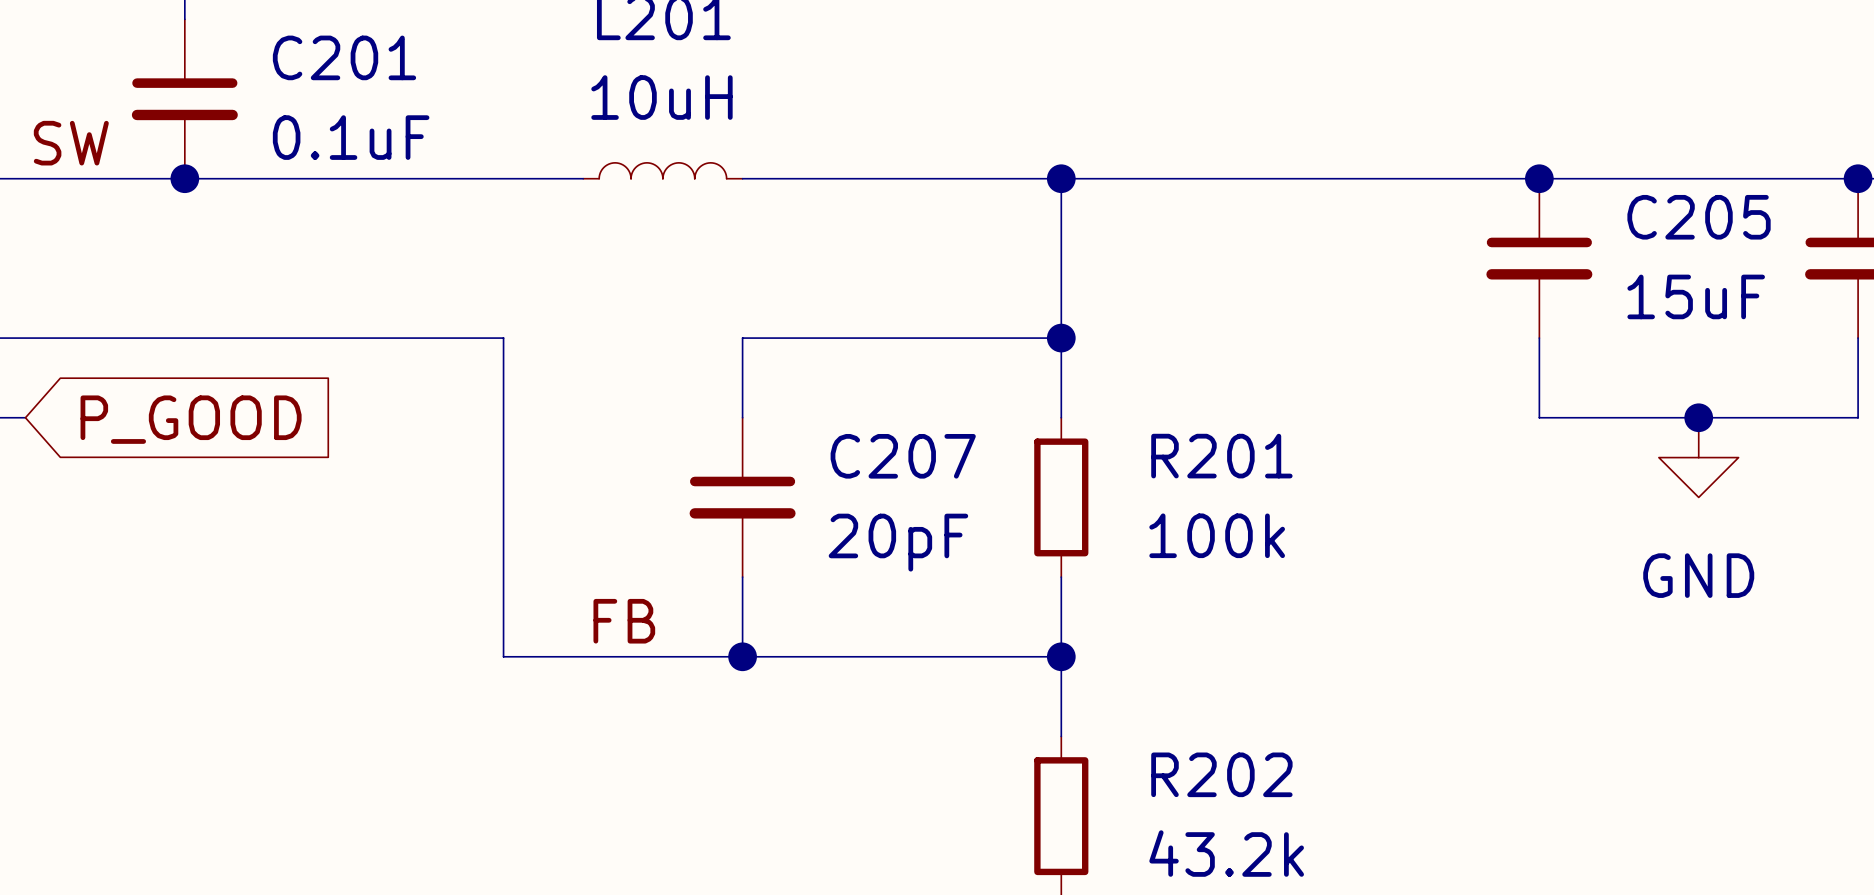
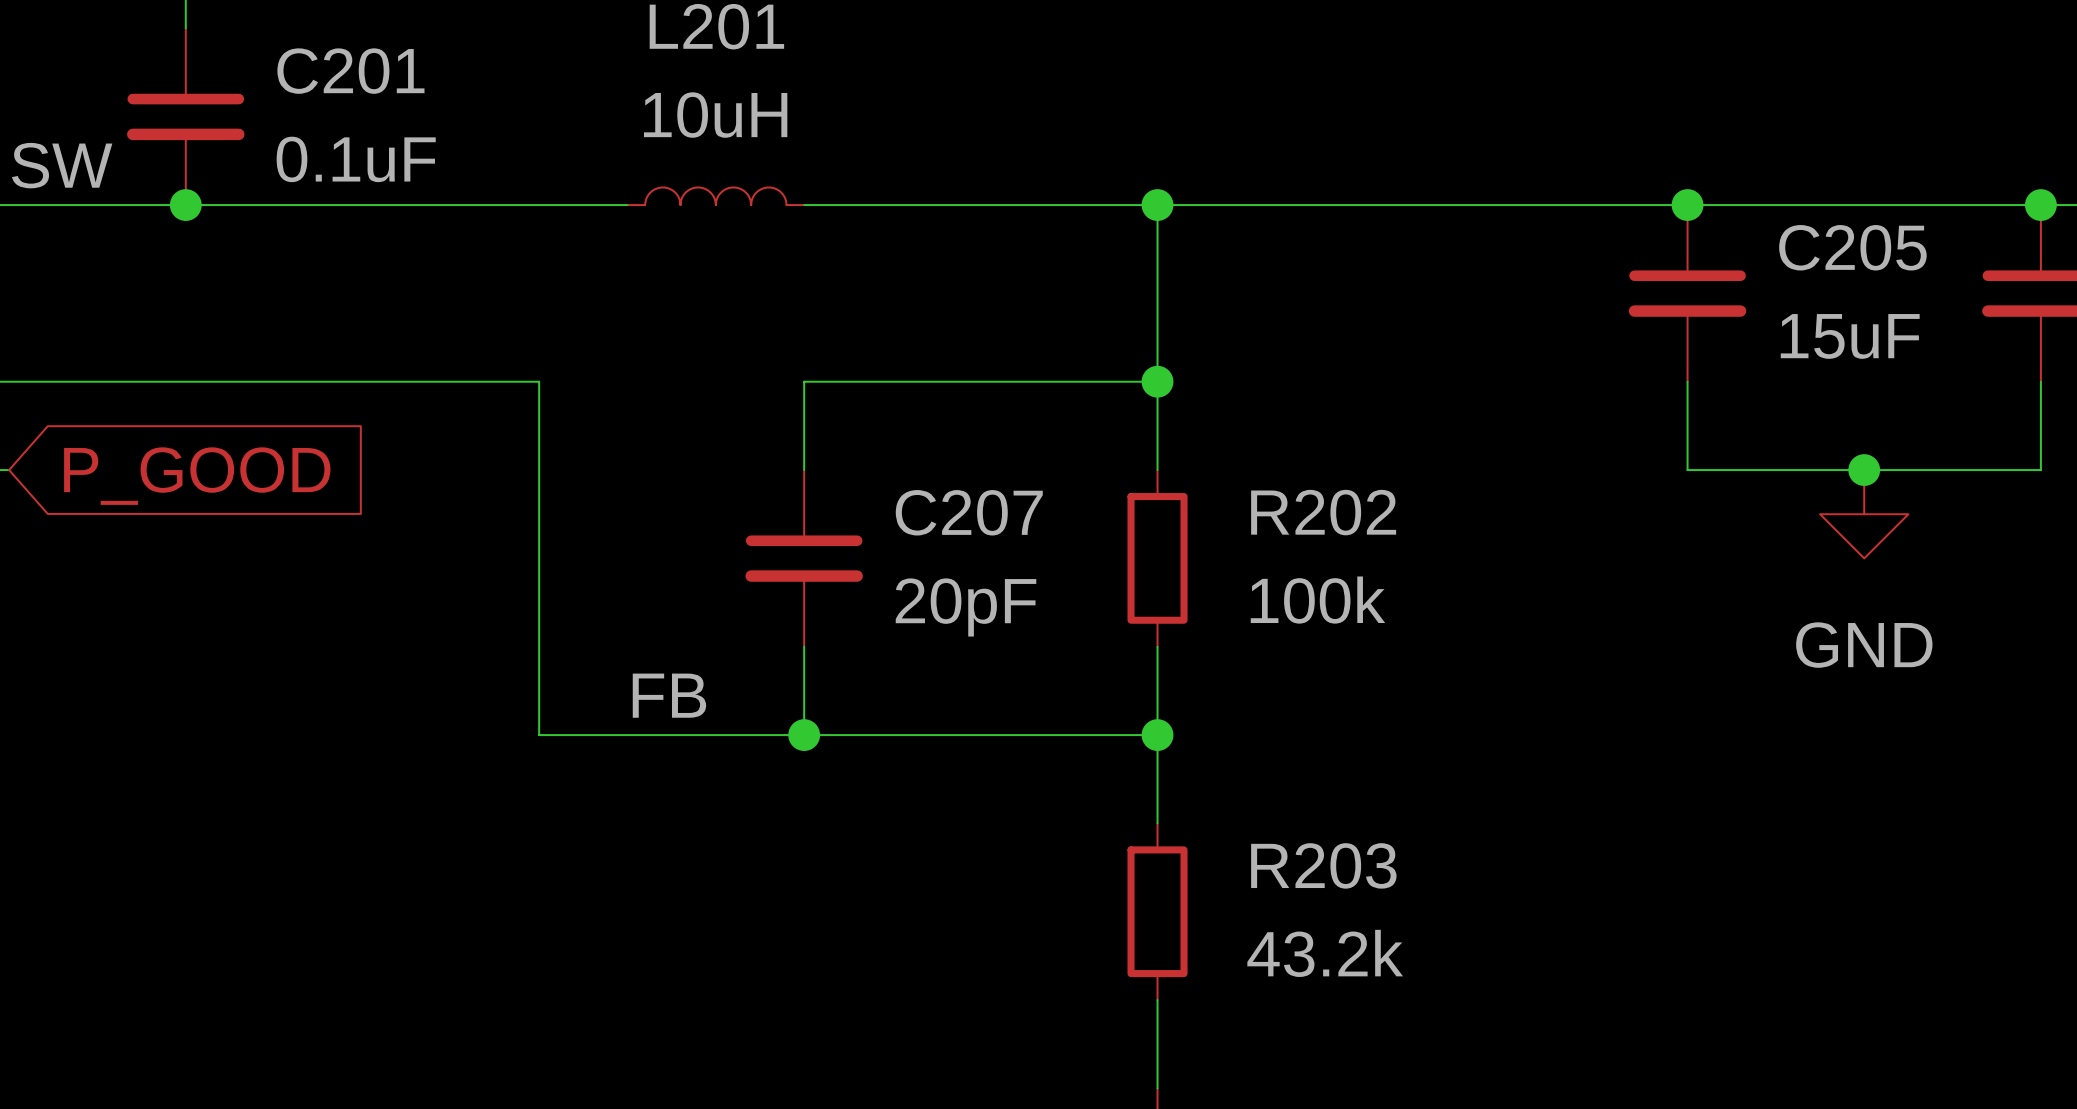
R201 name: R201 (1221, 456) -> R202 (1323, 512)
R202 name: R202 (1221, 774) -> R203 (1323, 865)

